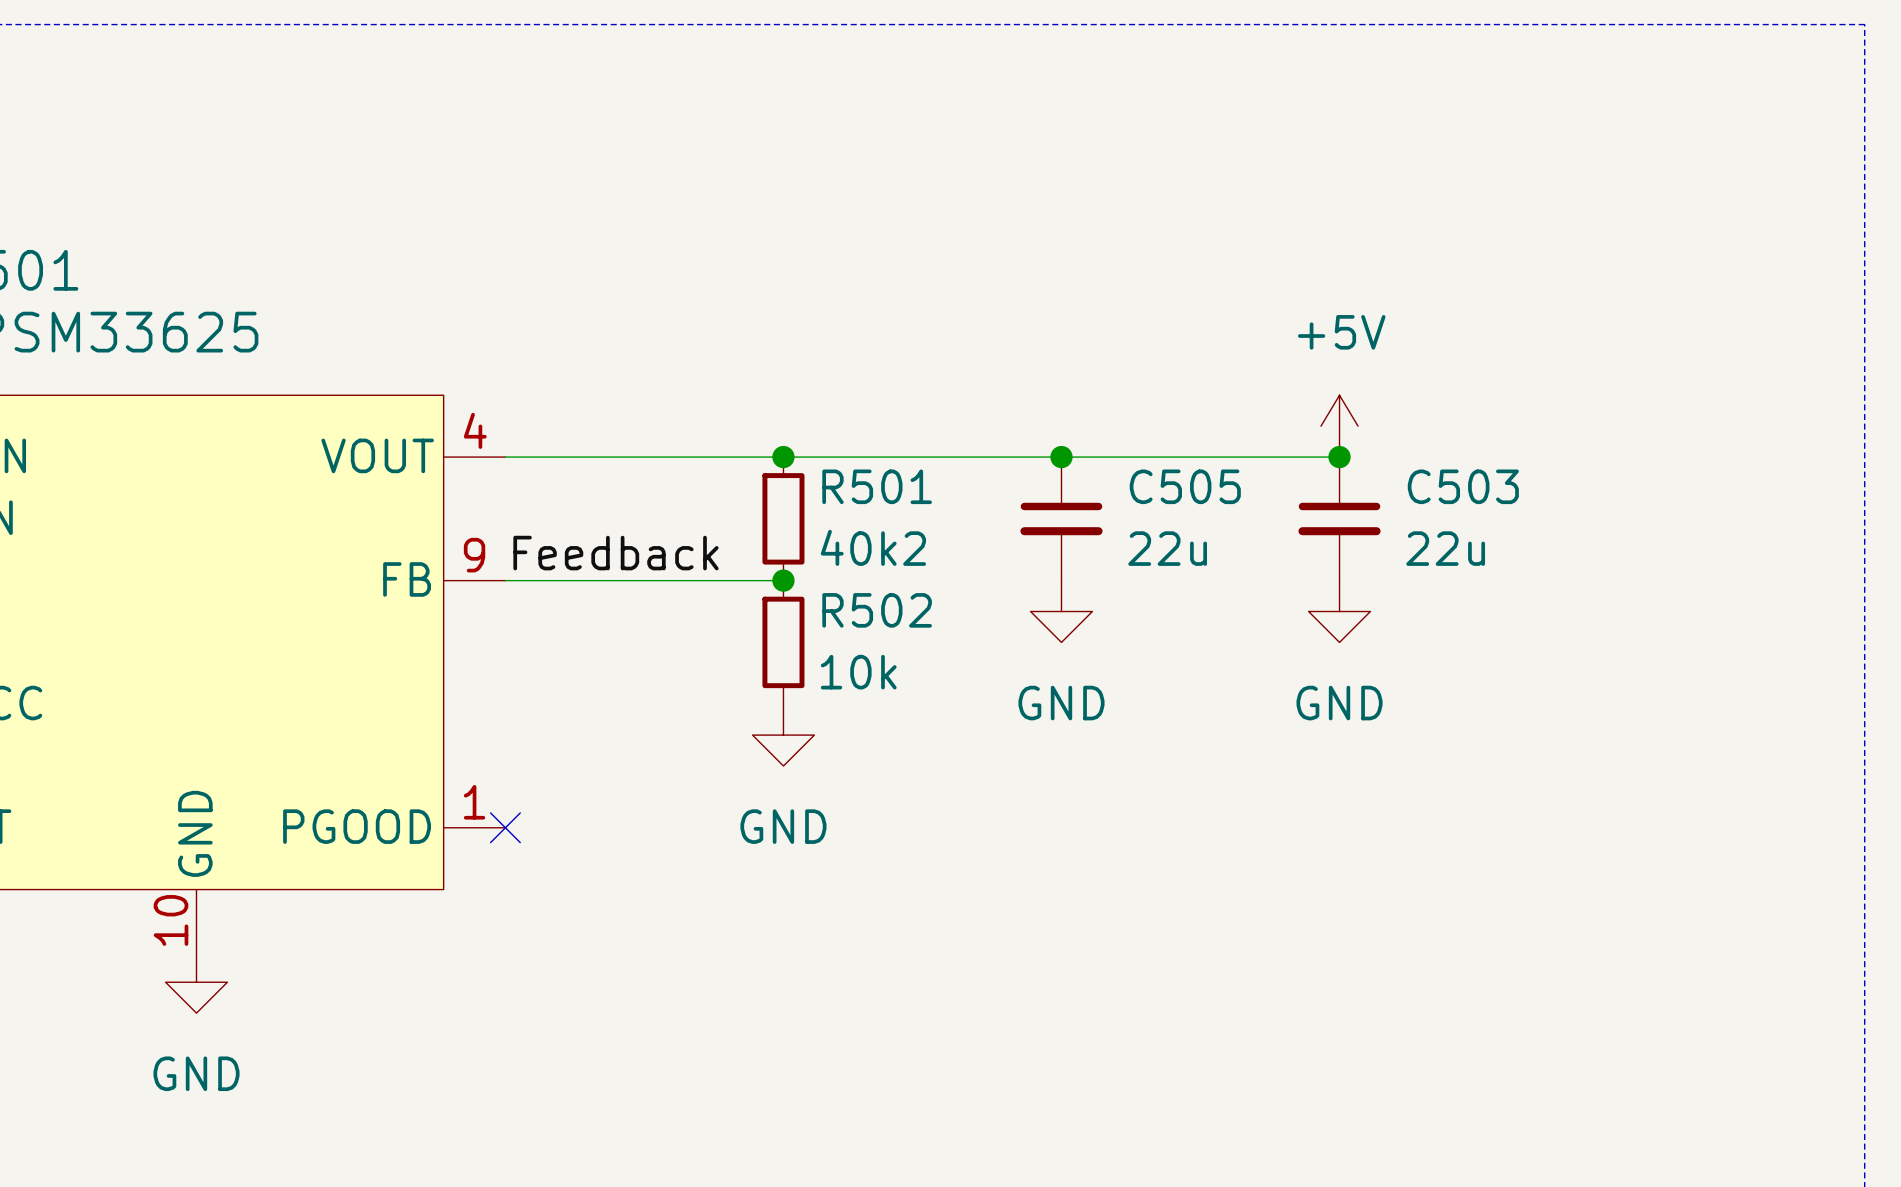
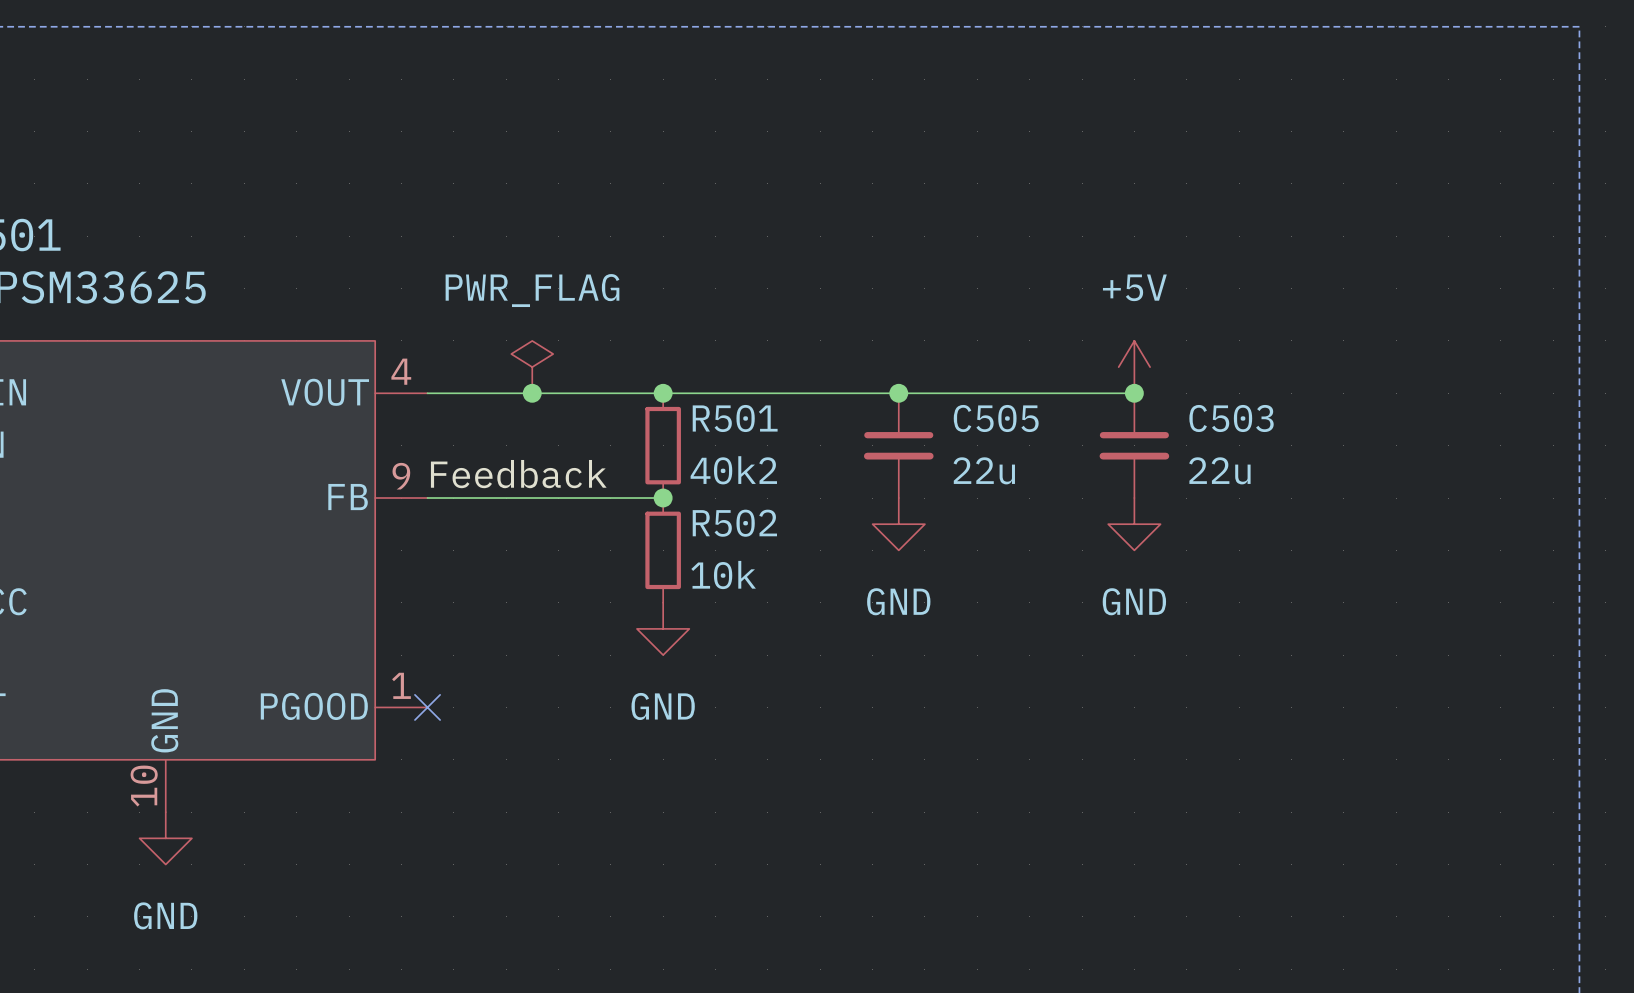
power symbol: none -> PWR_FLAG (532, 367)
junction: none -> (532, 393)

